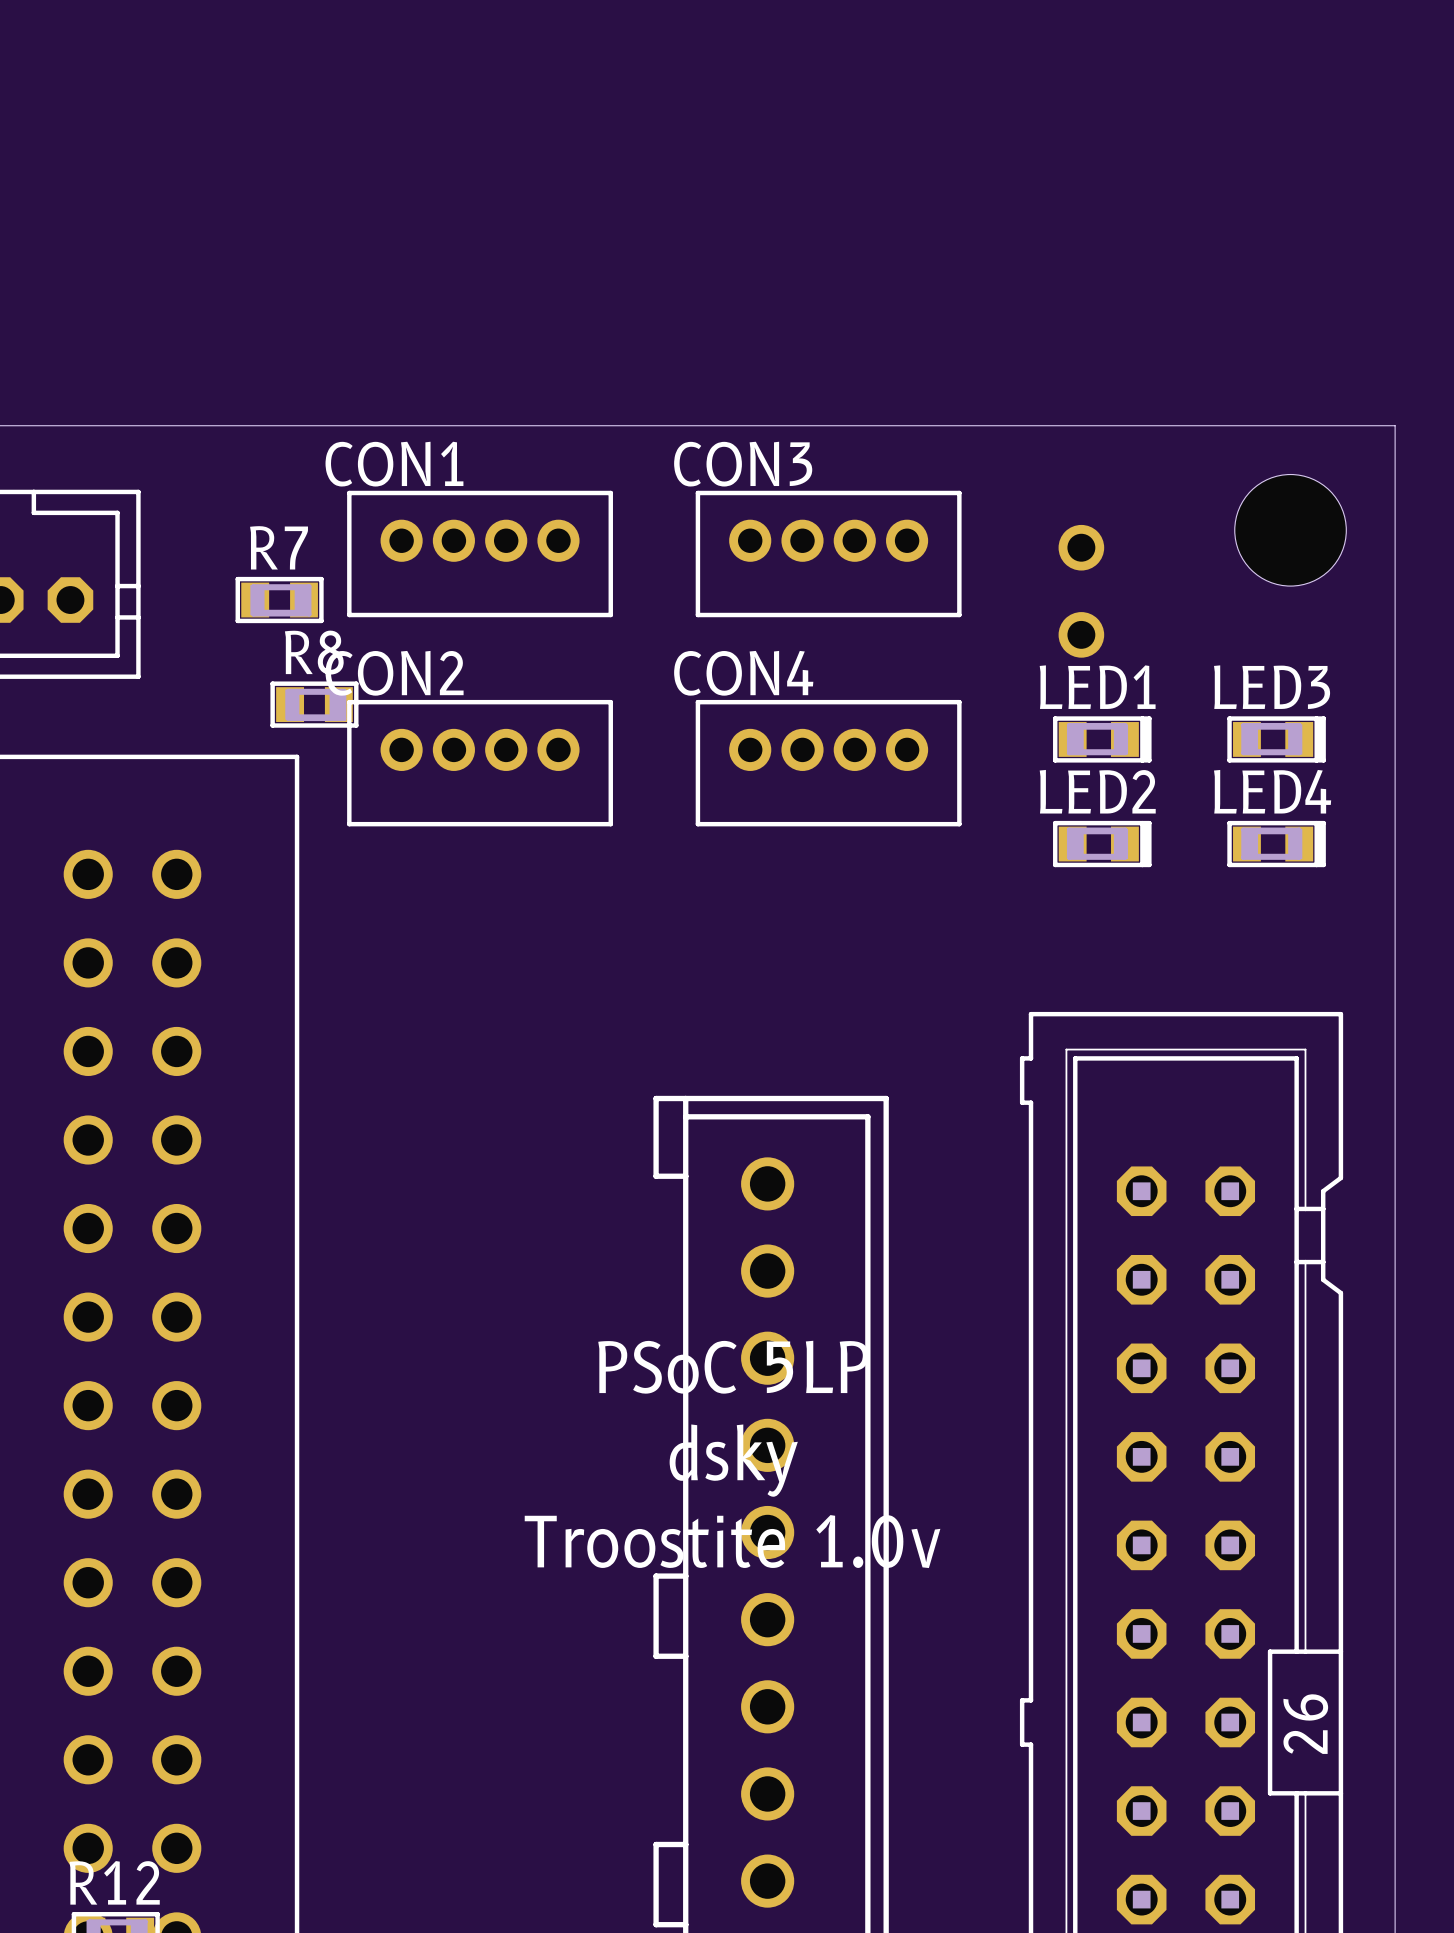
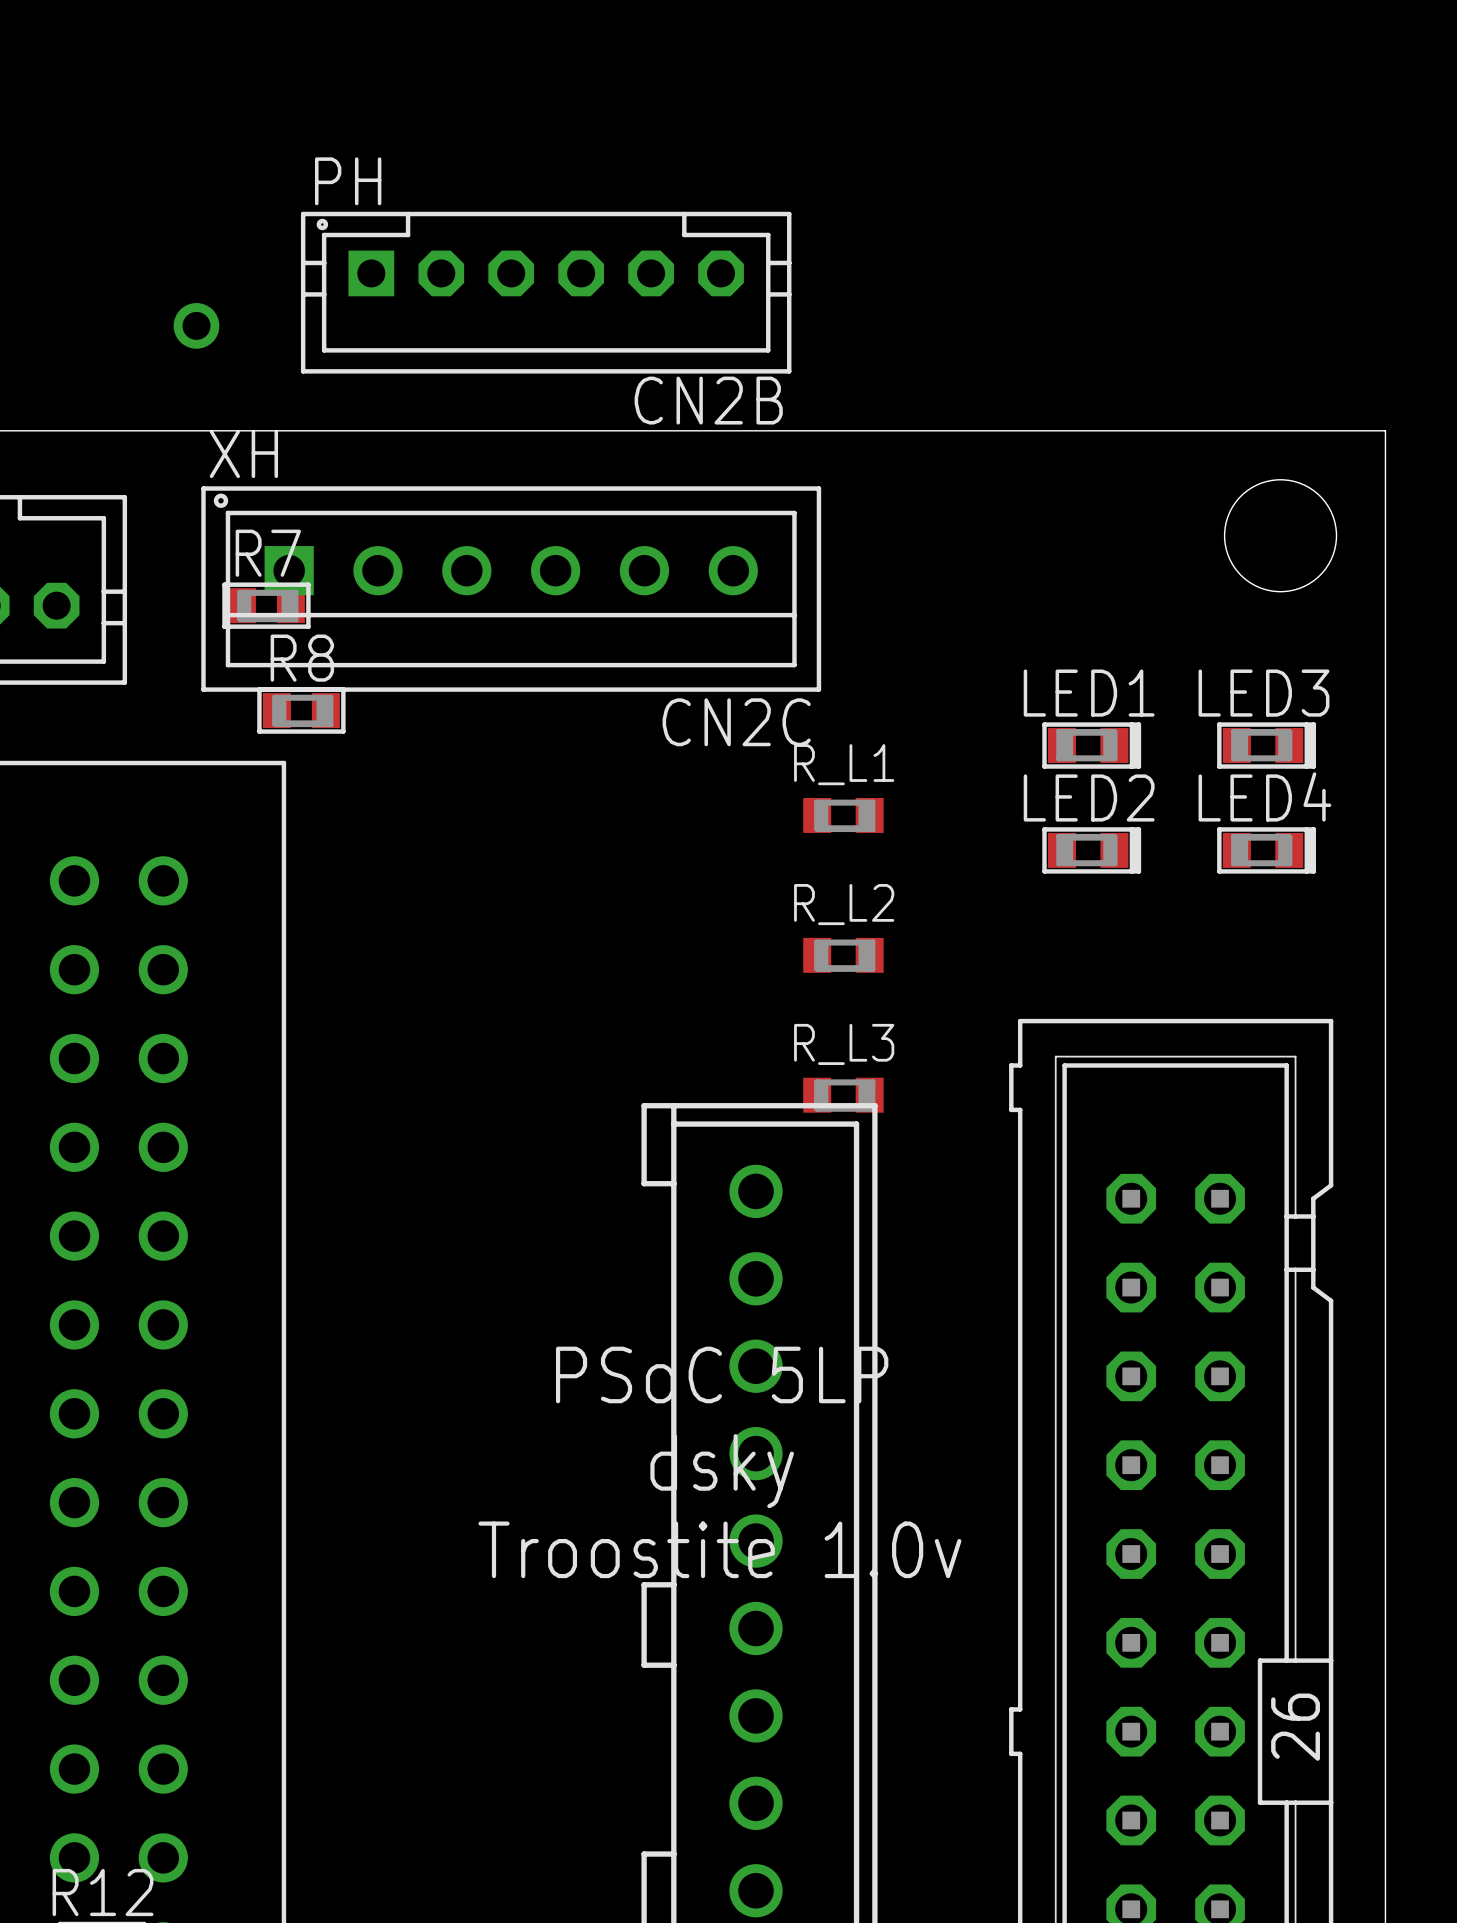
CN2B: none -> PH (546, 292)
part: none -> (196, 325)
part: (1081, 547) -> none
CON1: (480, 554) -> none
CON3: (828, 554) -> none
CN2C: none -> XH (511, 589)
part: (1081, 634) -> none
CON2: (480, 763) -> none
CON4: (828, 763) -> none
R_L1: none -> (843, 815)
R_L2: none -> (843, 955)
R_L3: none -> (843, 1095)

